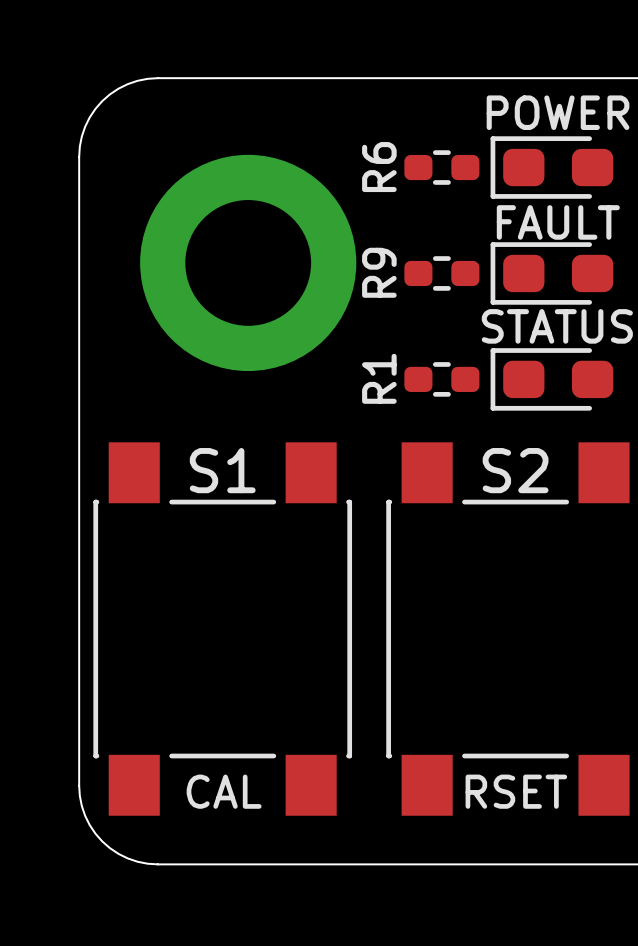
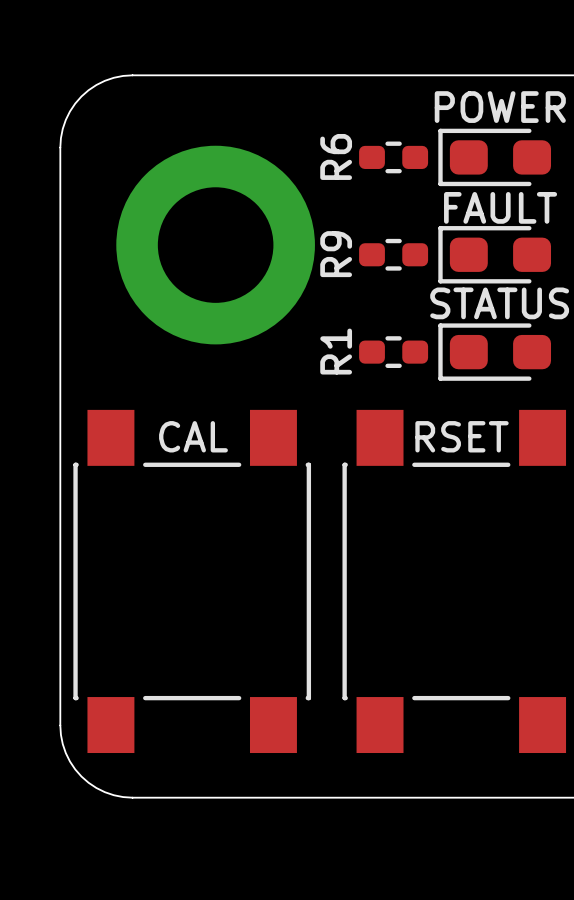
S1 name: S1 (222, 470) -> none
S2 name: S2 (515, 470) -> none
S1 value position: CAL (224, 791) -> CAL (193, 436)
S2 value position: RSET (516, 791) -> RSET (462, 436)

